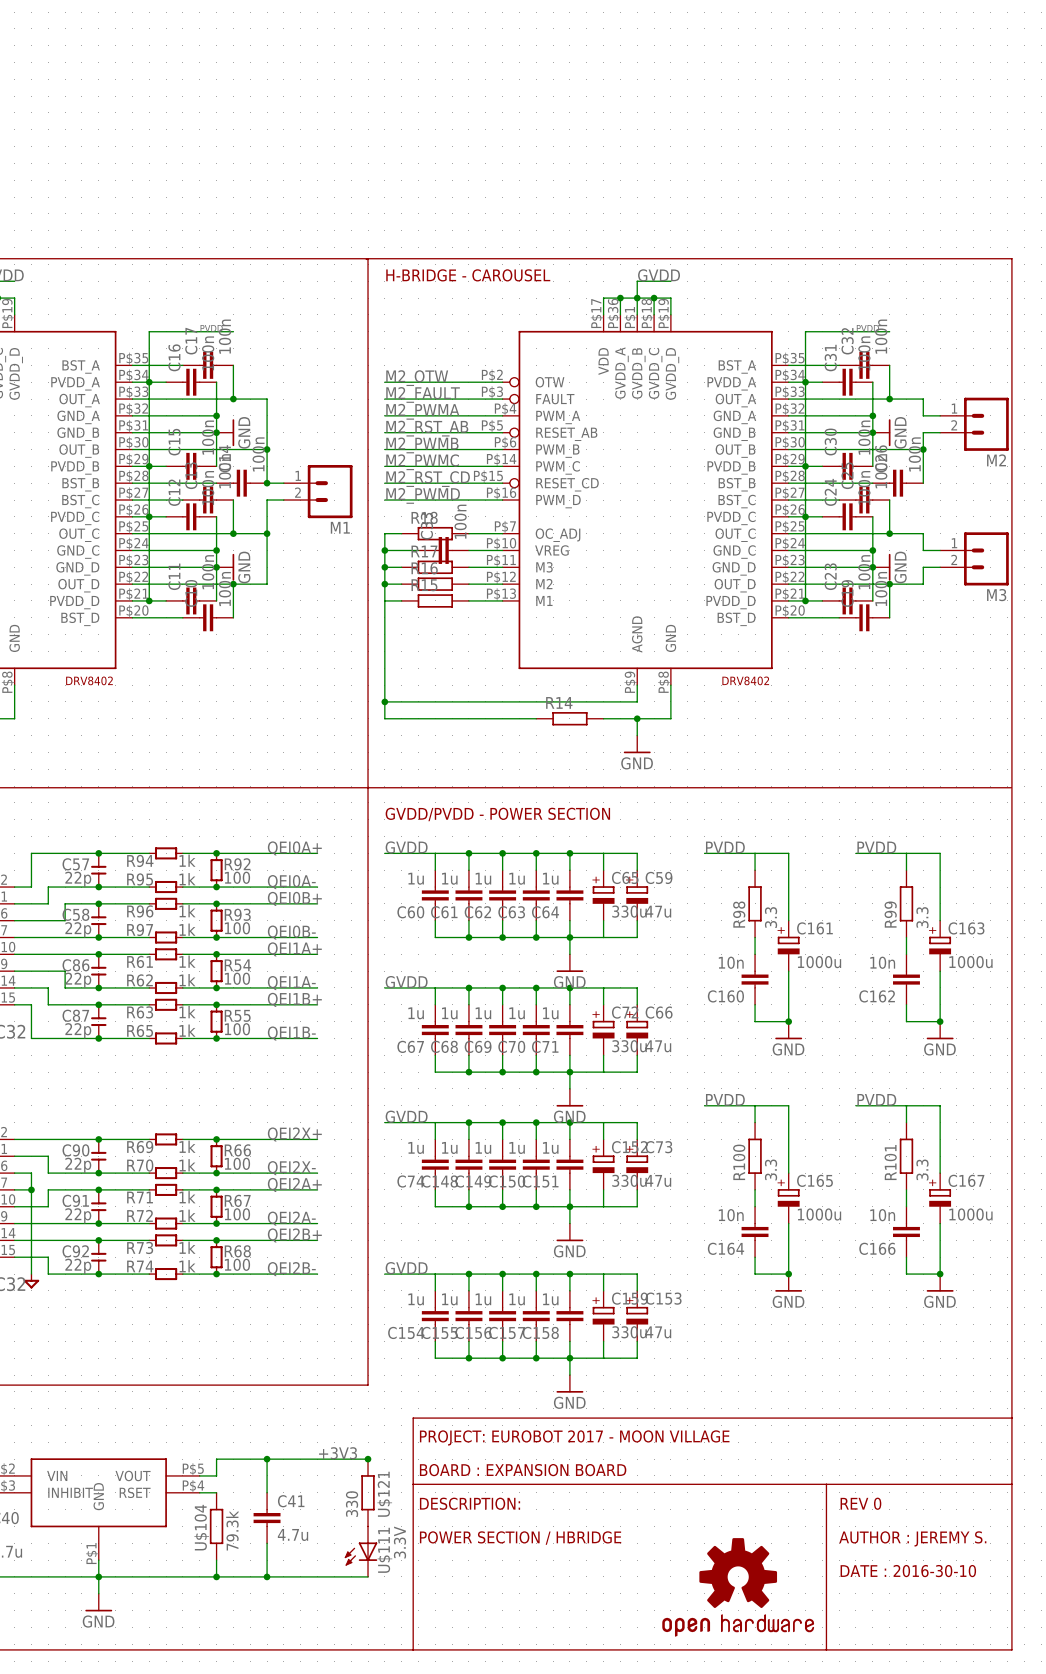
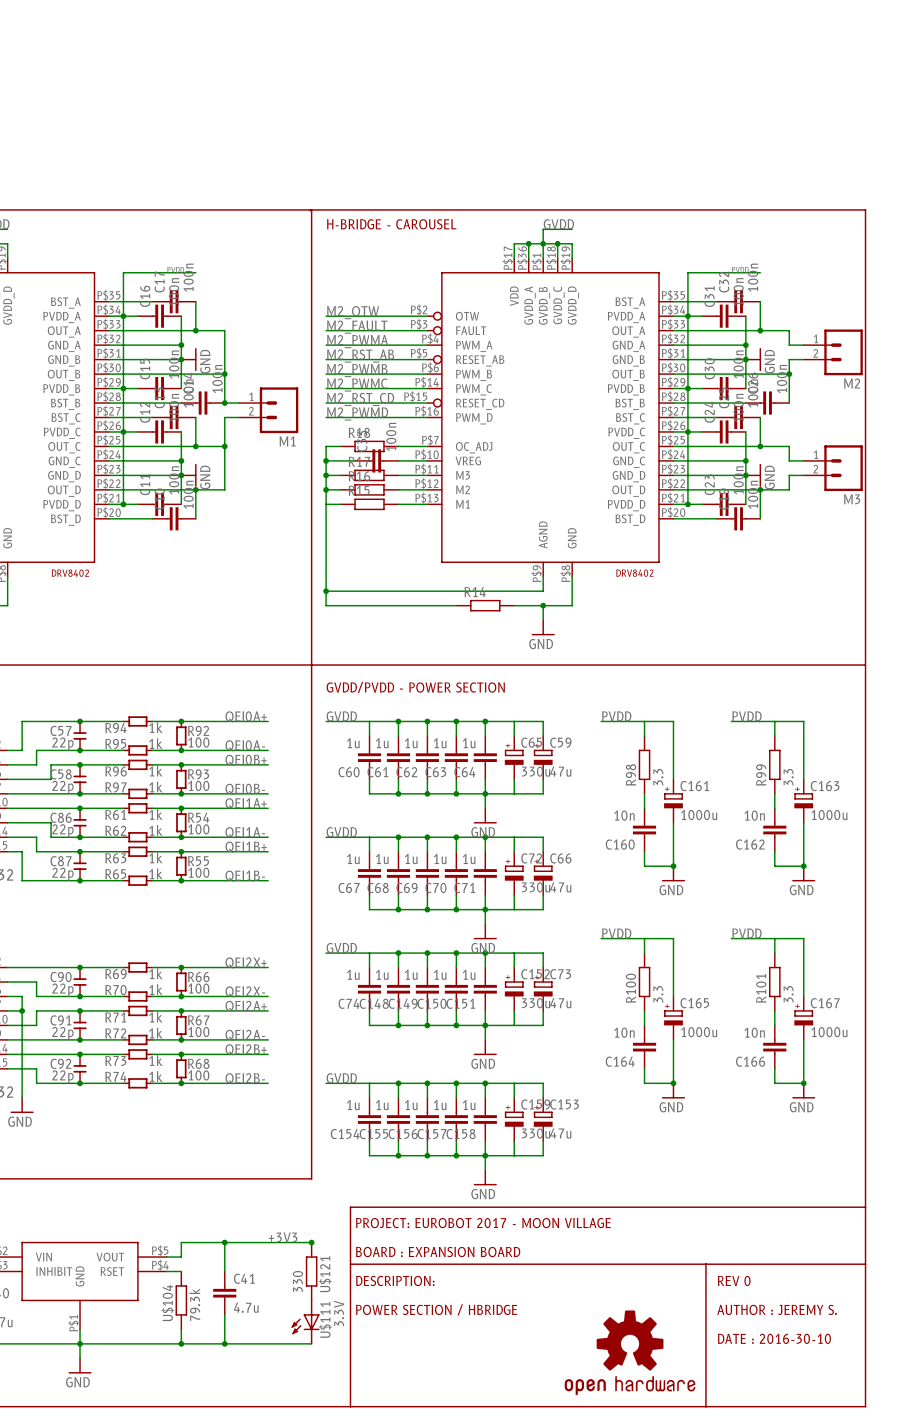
power symbol: (31, 1280) -> none
power symbol: none -> GND (22, 1105)

